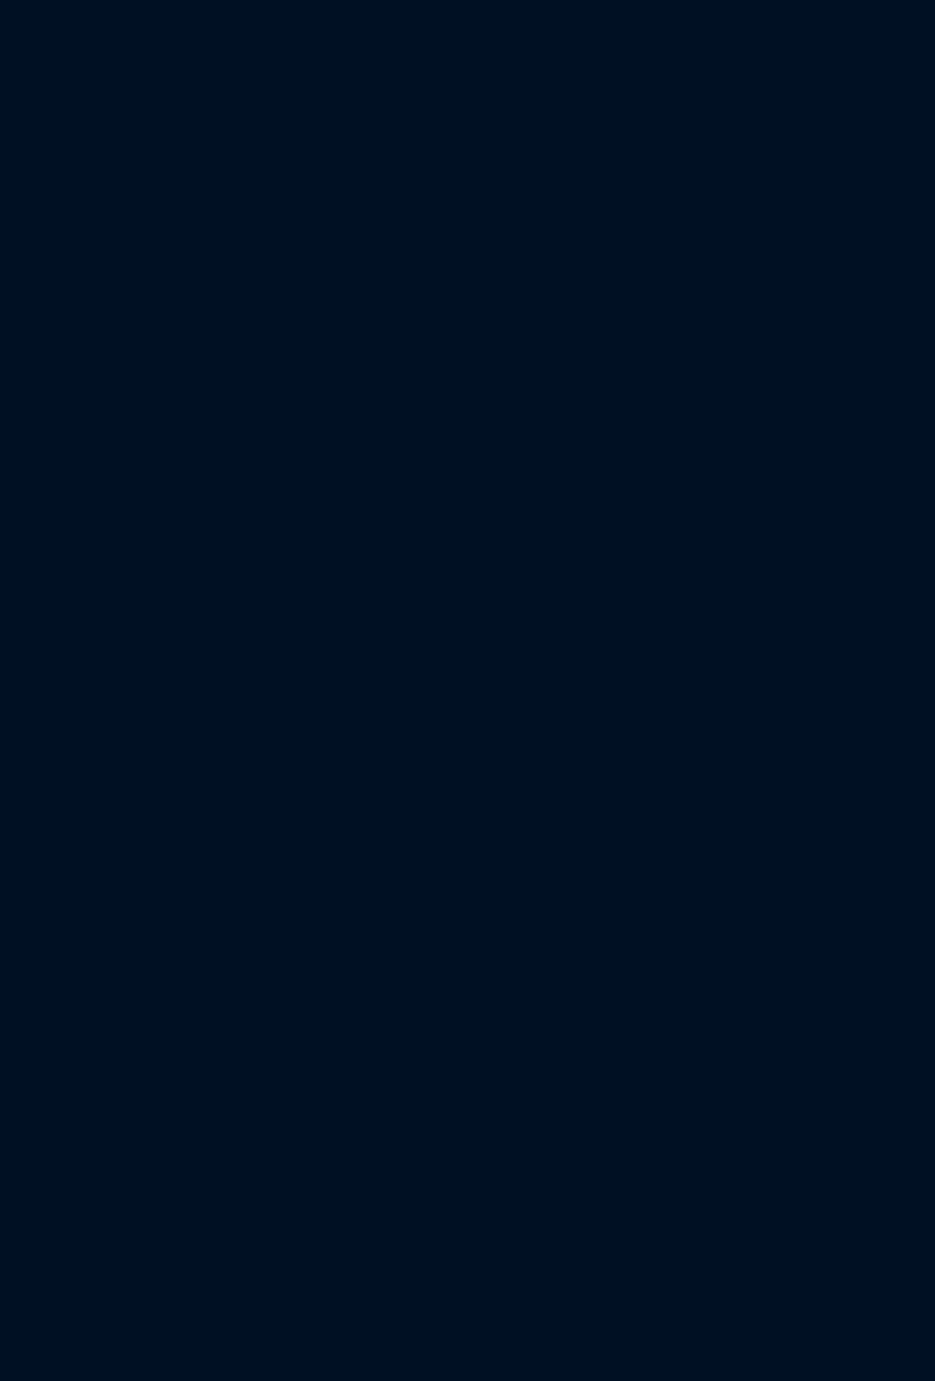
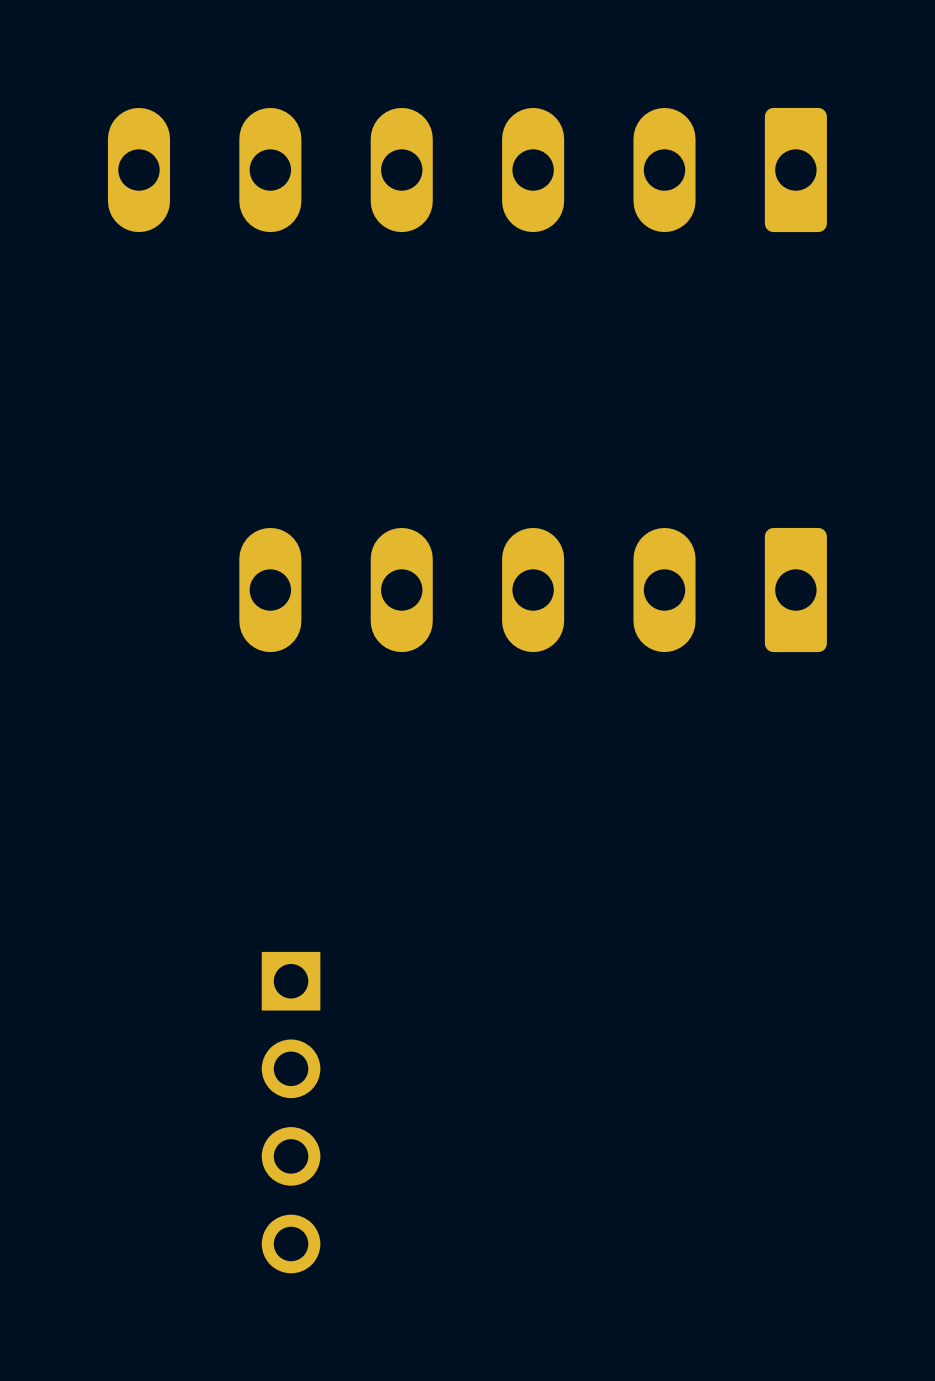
part: none -> (467, 170)
part: none -> (533, 590)
part: none -> (291, 1112)

